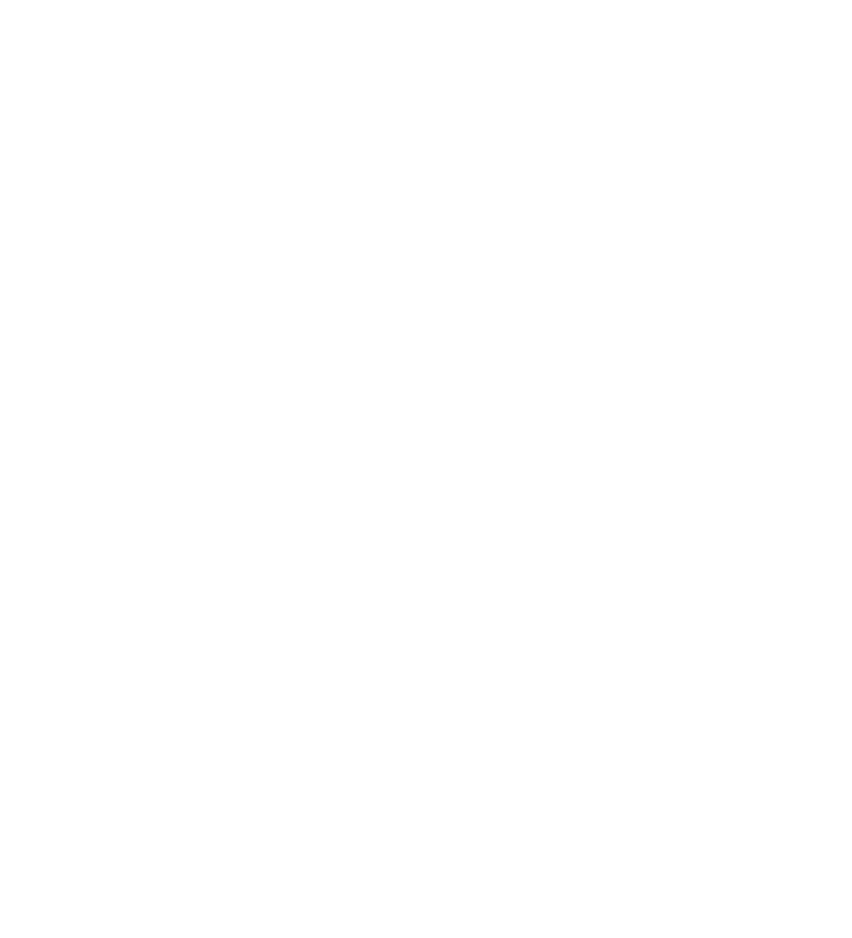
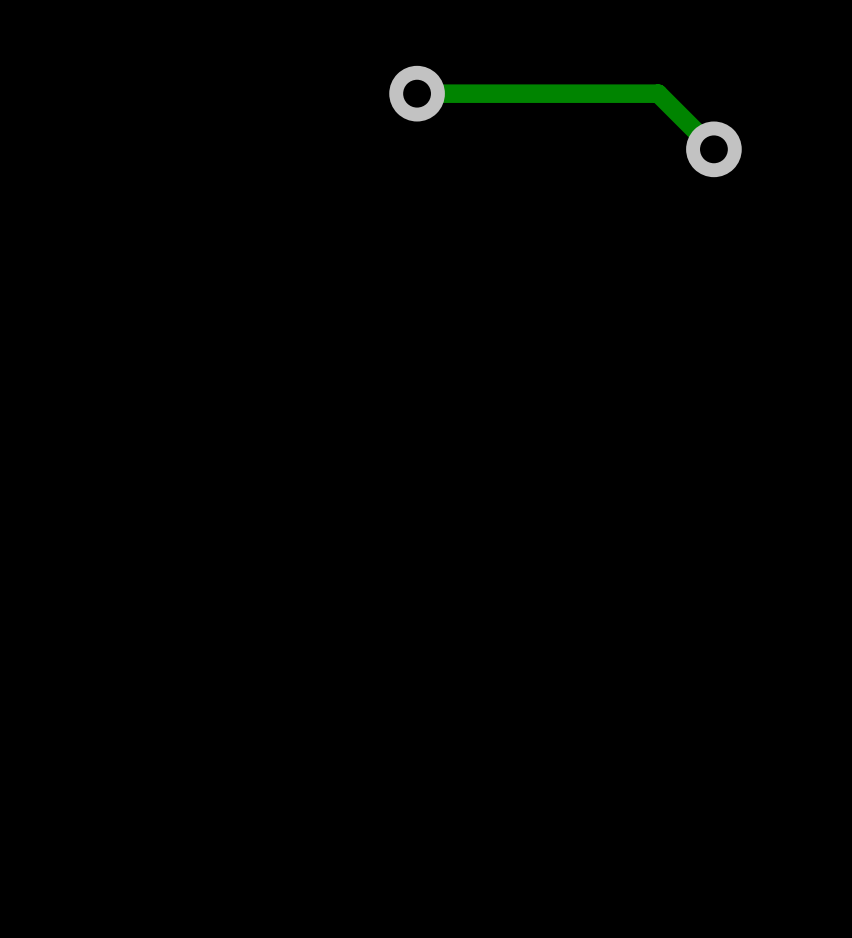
track: none -> (417, 93) (658, 93) (713, 149)
via: none -> (417, 93)
via: none -> (713, 149)

